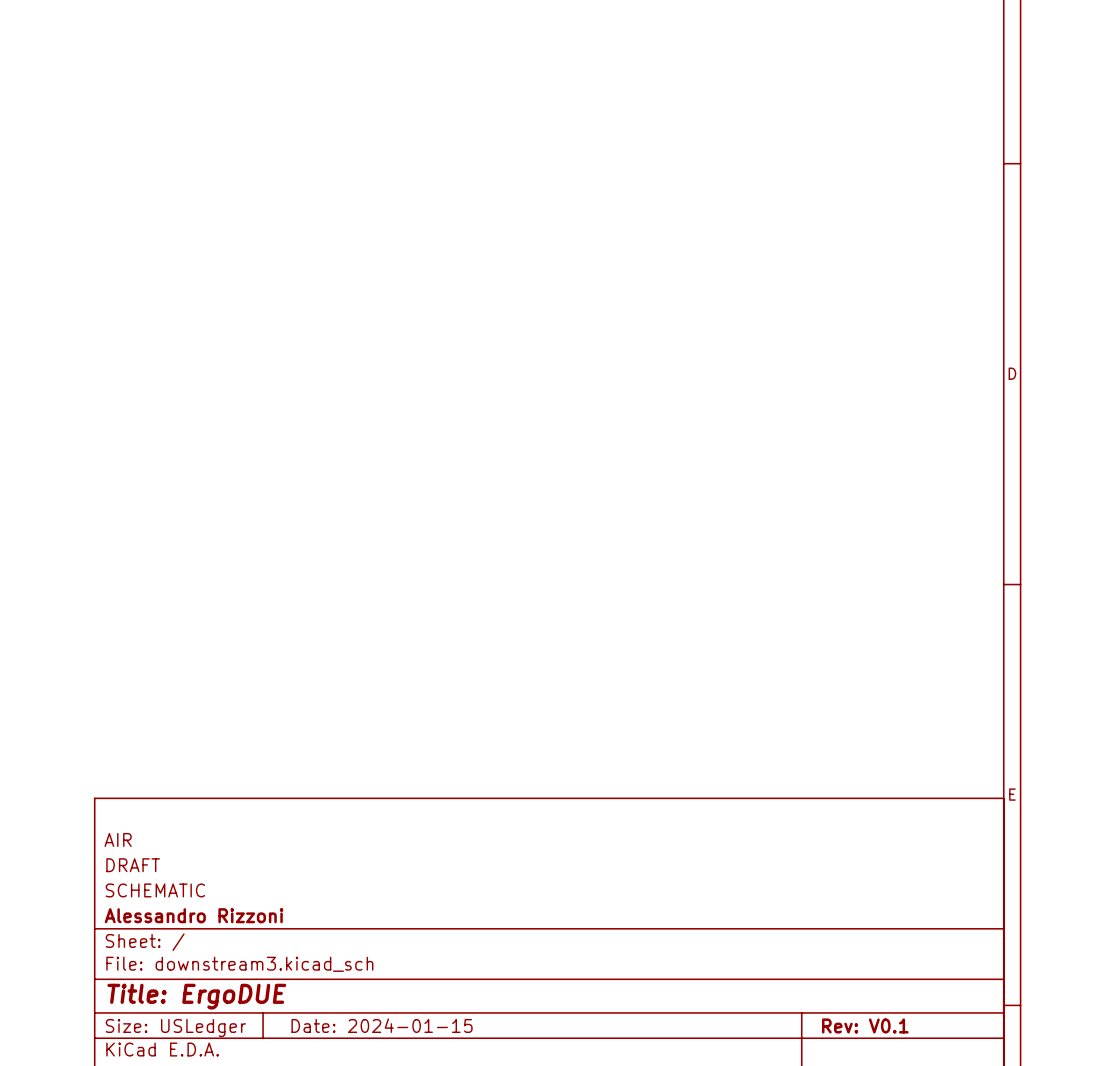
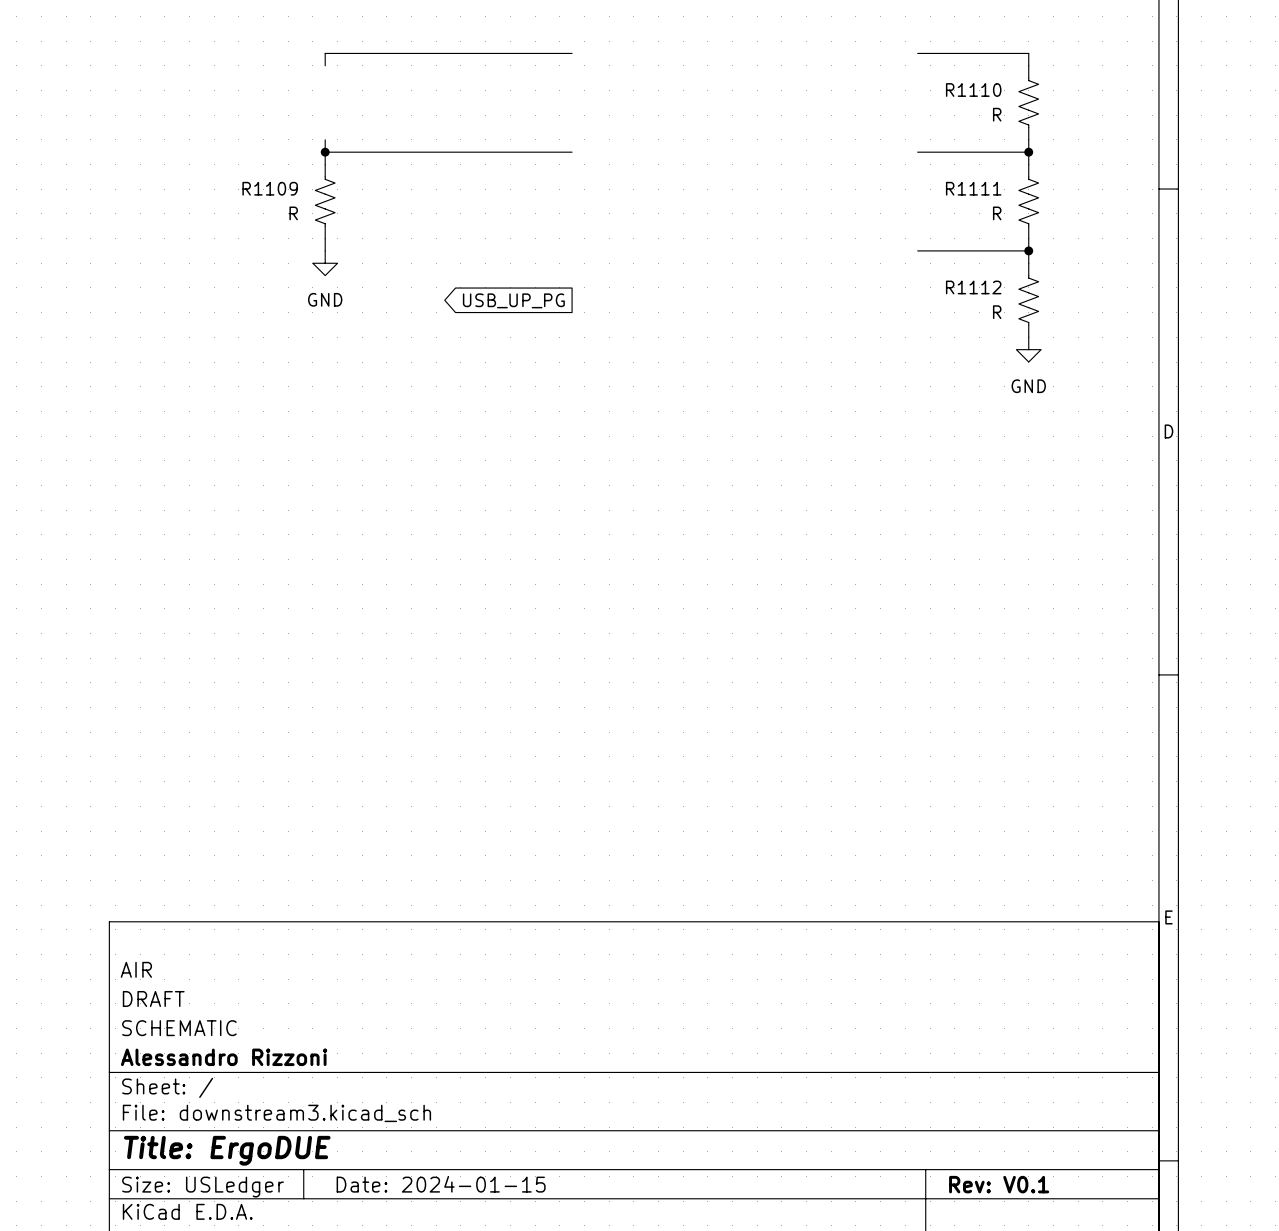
wire: none -> (572, 53) (325, 53) (325, 65)
wire: none -> (917, 53) (1028, 53) (1028, 65)
R1110: none -> R (1028, 102)
wire: none -> (325, 139) (325, 164)
wire: none -> (1028, 139) (1028, 164)
wire: none -> (325, 152) (572, 152)
junction: none -> (325, 152)
wire: none -> (917, 152) (1028, 152)
junction: none -> (1028, 152)
R1109: none -> R (325, 201)
R1111: none -> R (1028, 201)
wire: none -> (325, 238) (325, 250)
wire: none -> (1028, 238) (1028, 263)
wire: none -> (917, 250) (1028, 250)
junction: none -> (1028, 250)
power symbol: none -> GND (325, 263)
global label: none -> USB_UP_PG (513, 300)
R1112: none -> R (1028, 300)
power symbol: none -> GND (1028, 349)

